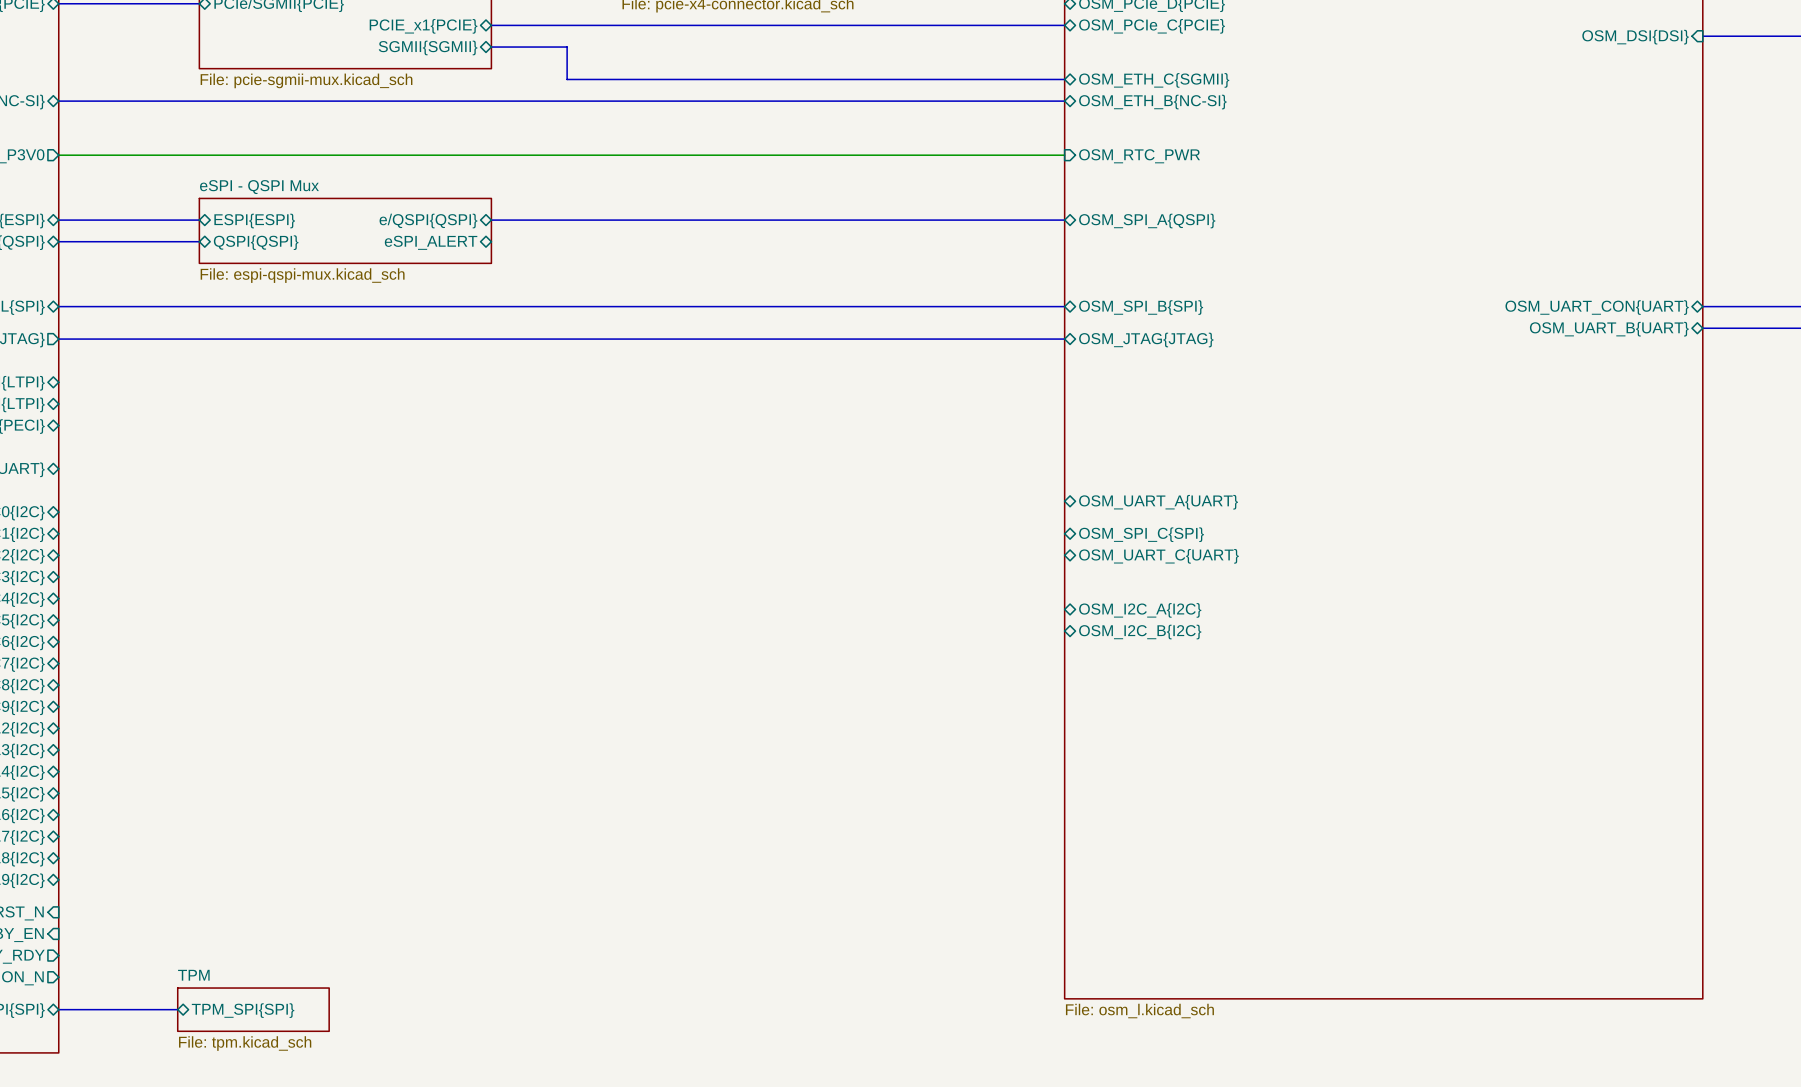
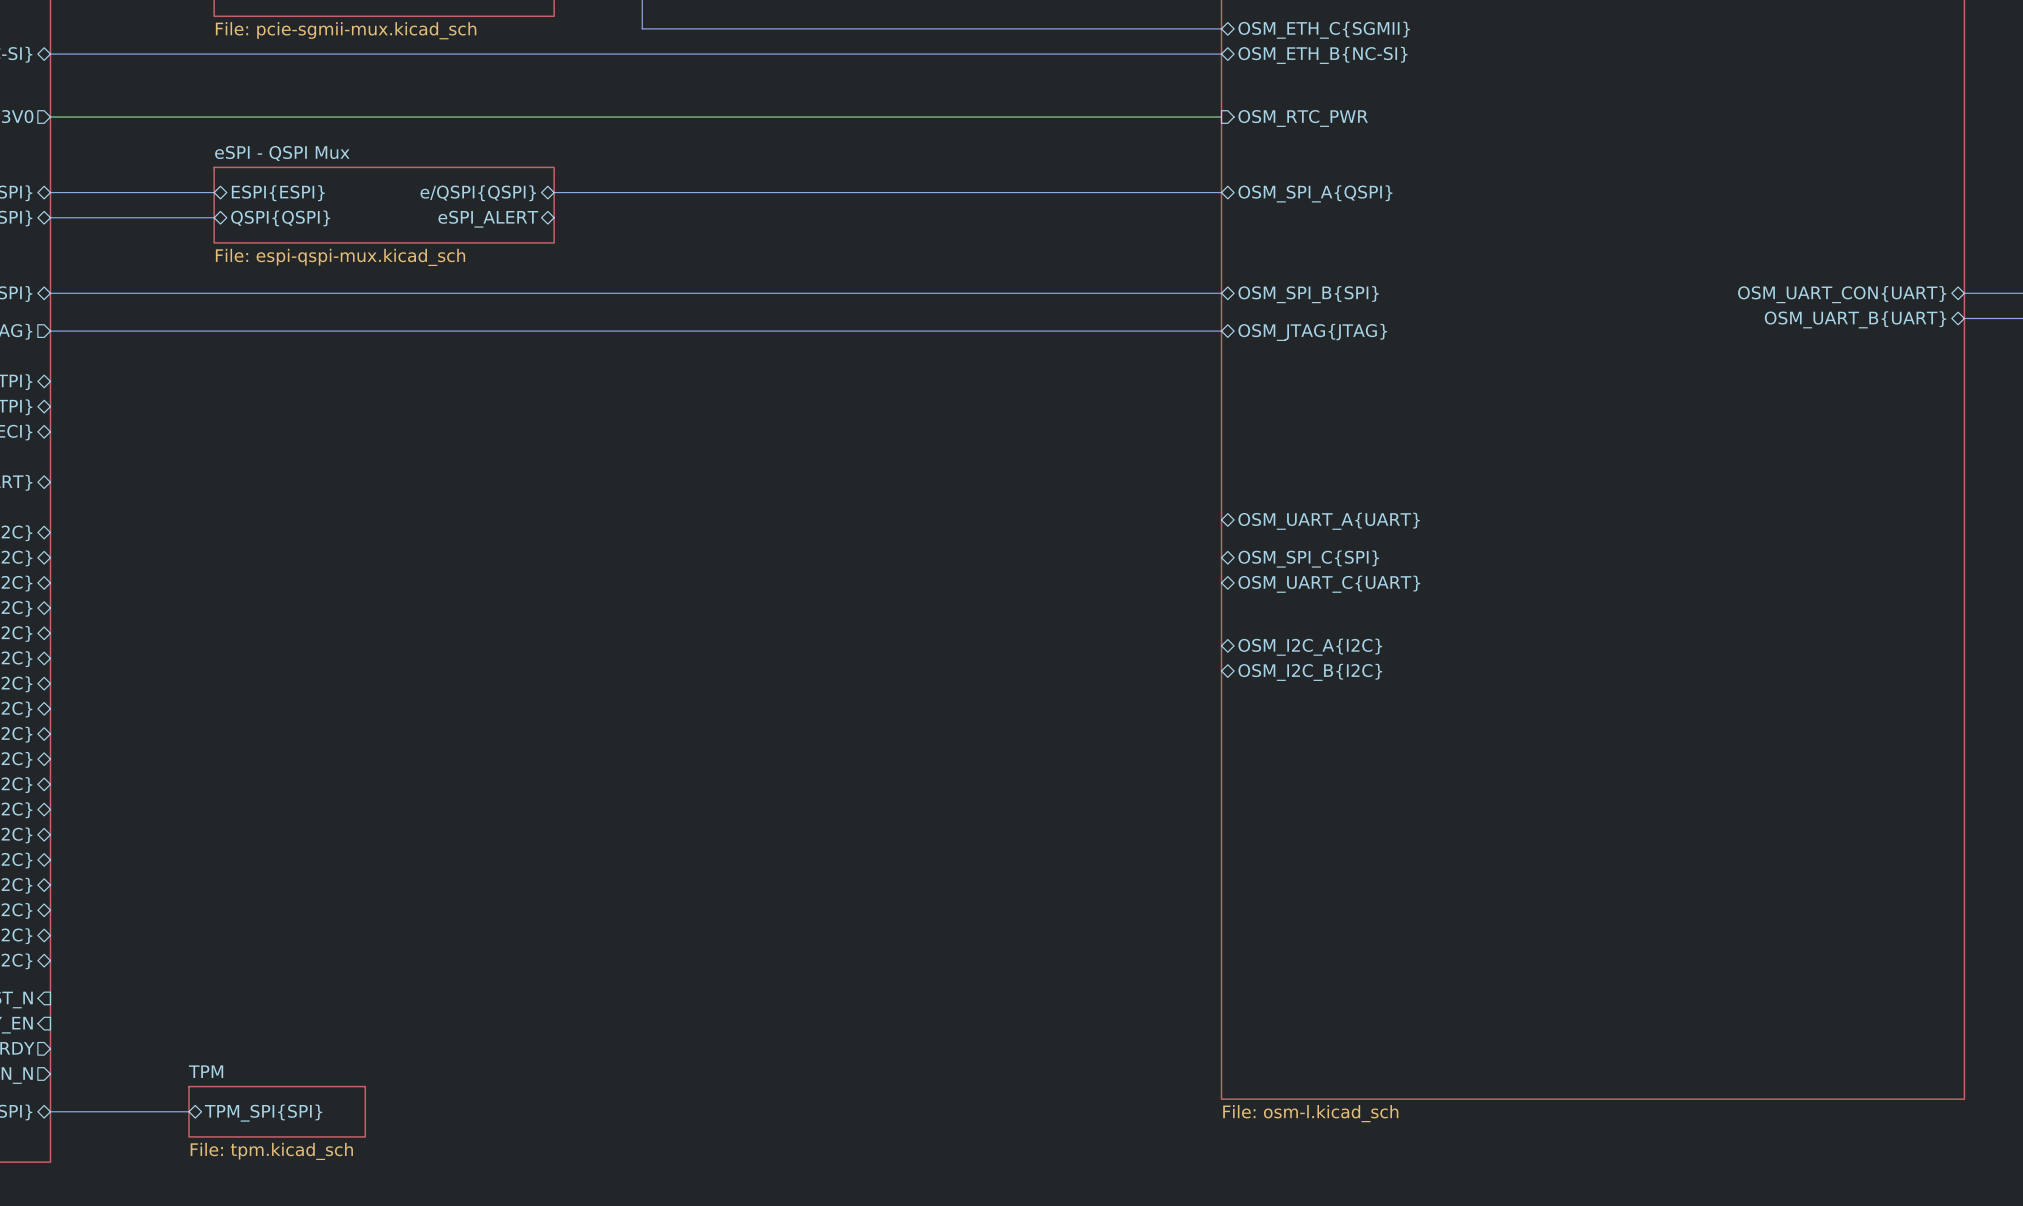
sheet value: File: osm_l.kicad_sch (1139, 1011) -> File: osm-l.kicad_sch (1310, 1113)

